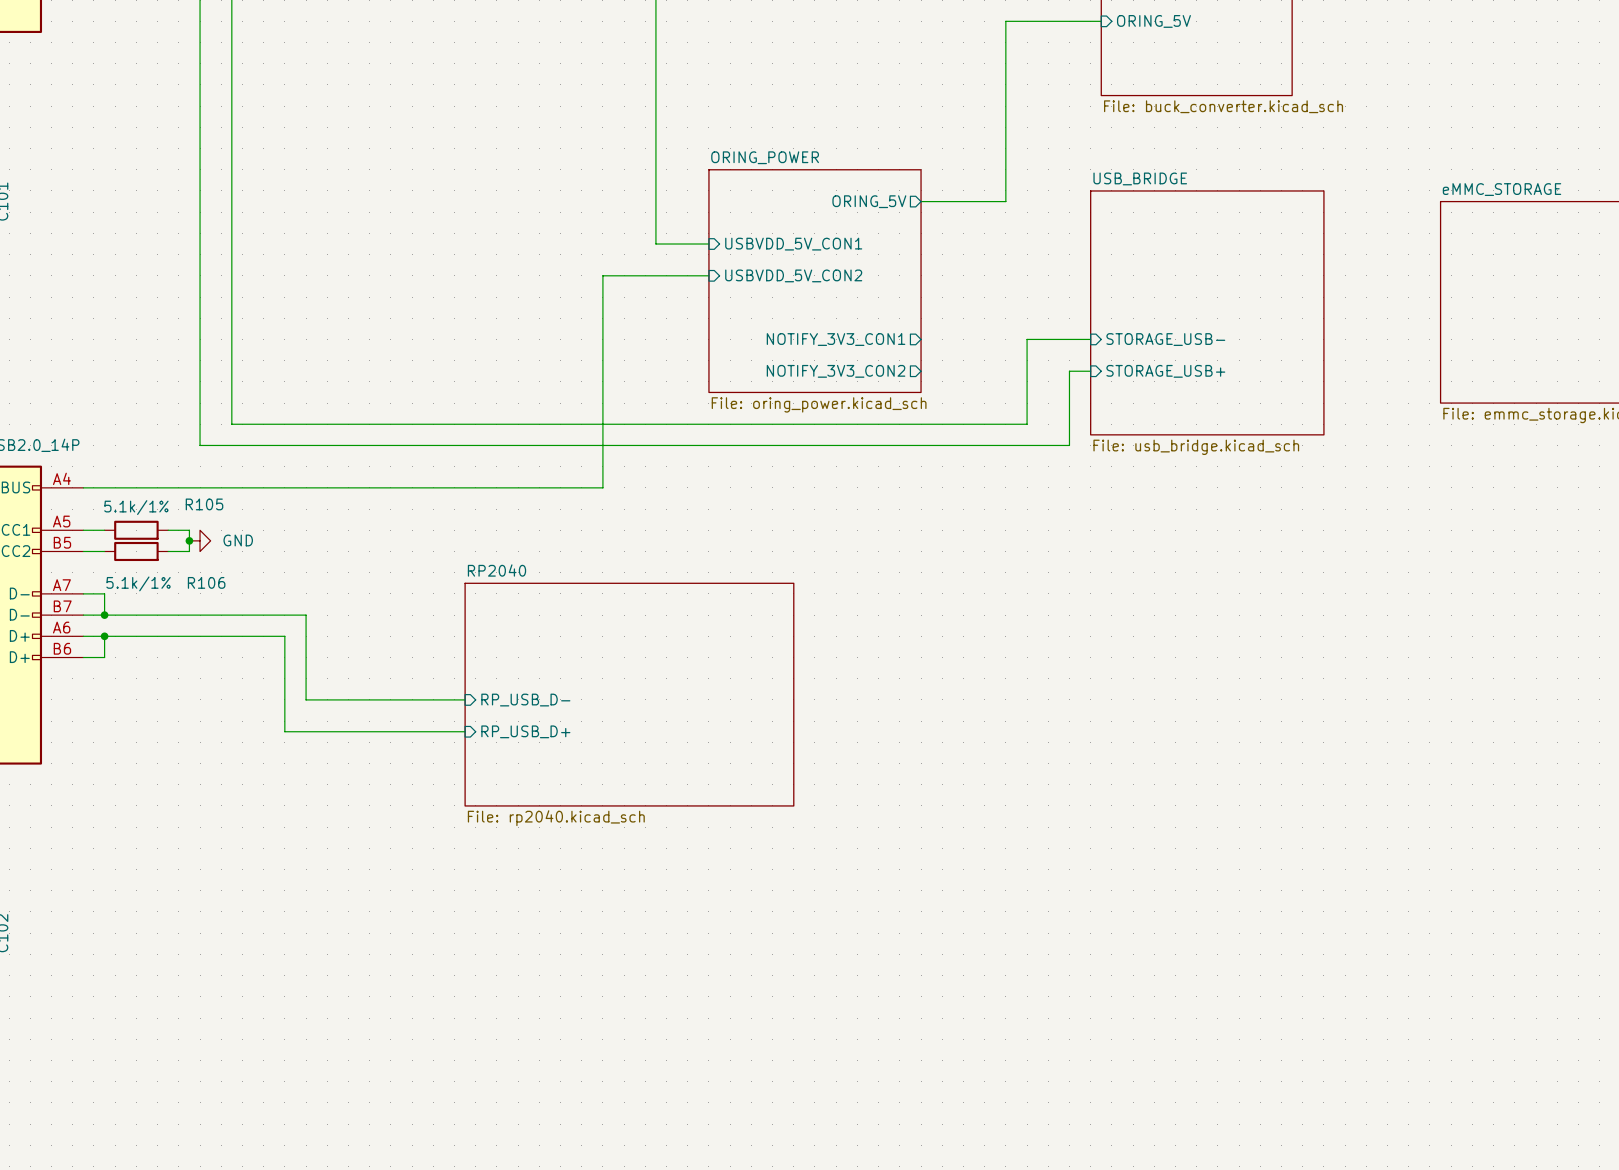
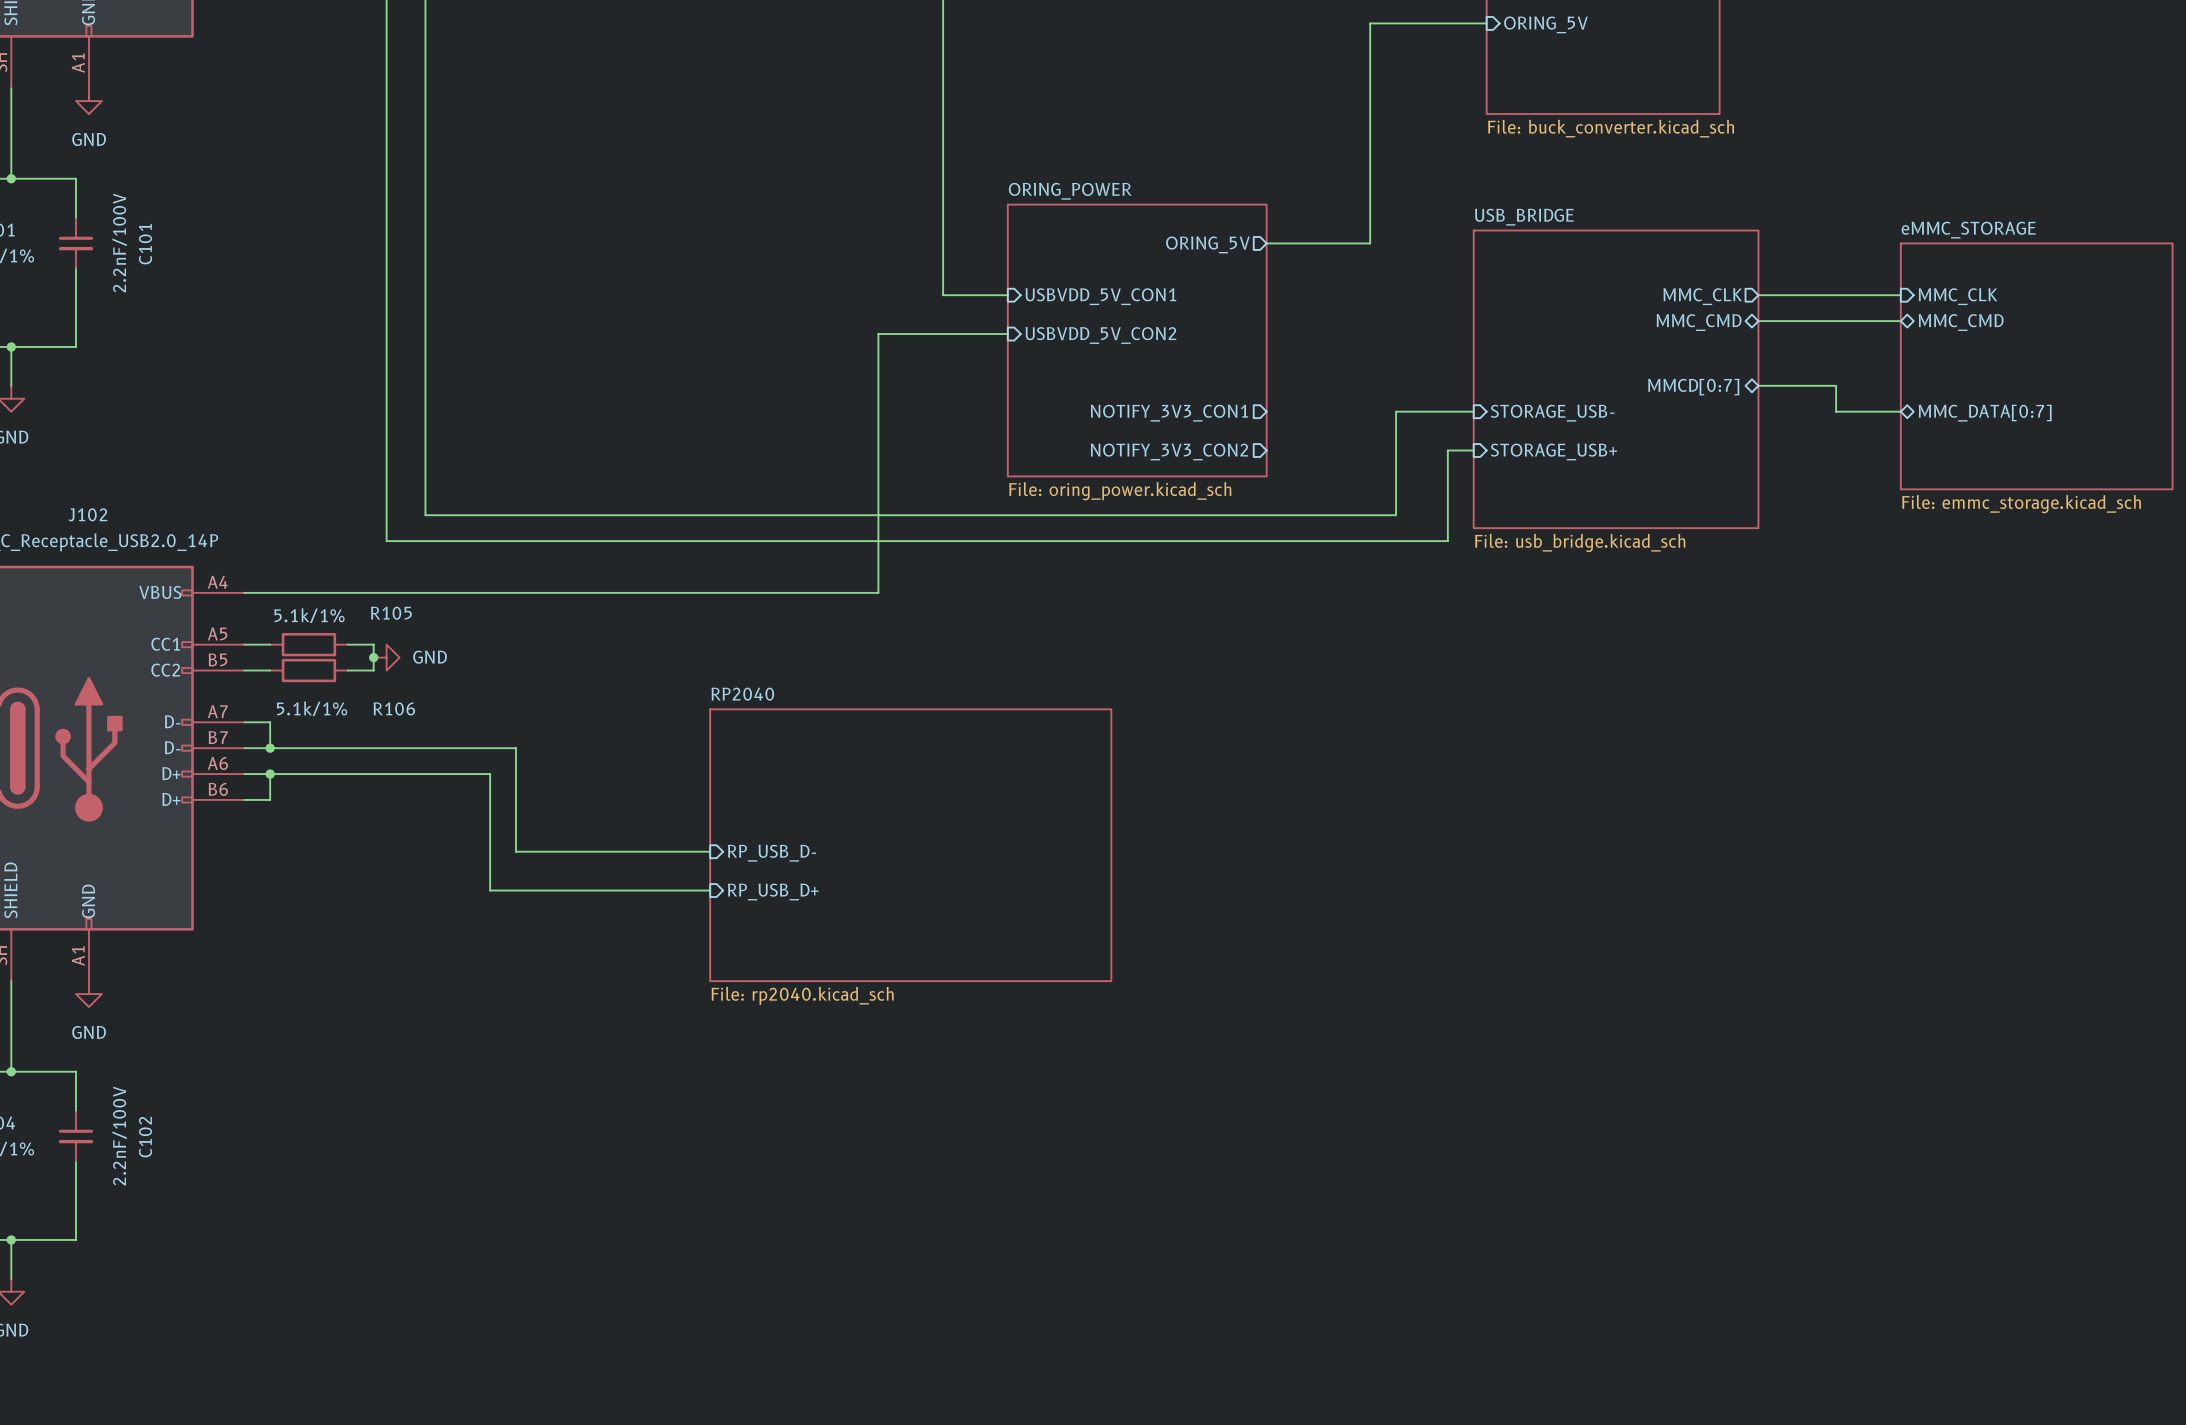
sheet pin: none -> MMC_CLK (1702, 296)
wire: none -> (1758, 295) (1900, 295)
sheet pin: none -> MMC_CLK (1957, 296)
sheet pin: none -> MMC_CMD (1699, 322)
wire: none -> (1758, 321) (1900, 321)
sheet pin: none -> MMC_CMD (1961, 322)
wire: none -> (1758, 385) (1836, 385) (1836, 411) (1900, 411)
sheet pin: none -> MMCD[0:7] (1693, 387)
sheet pin: none -> MMC_DATA[0:7] (1985, 413)

